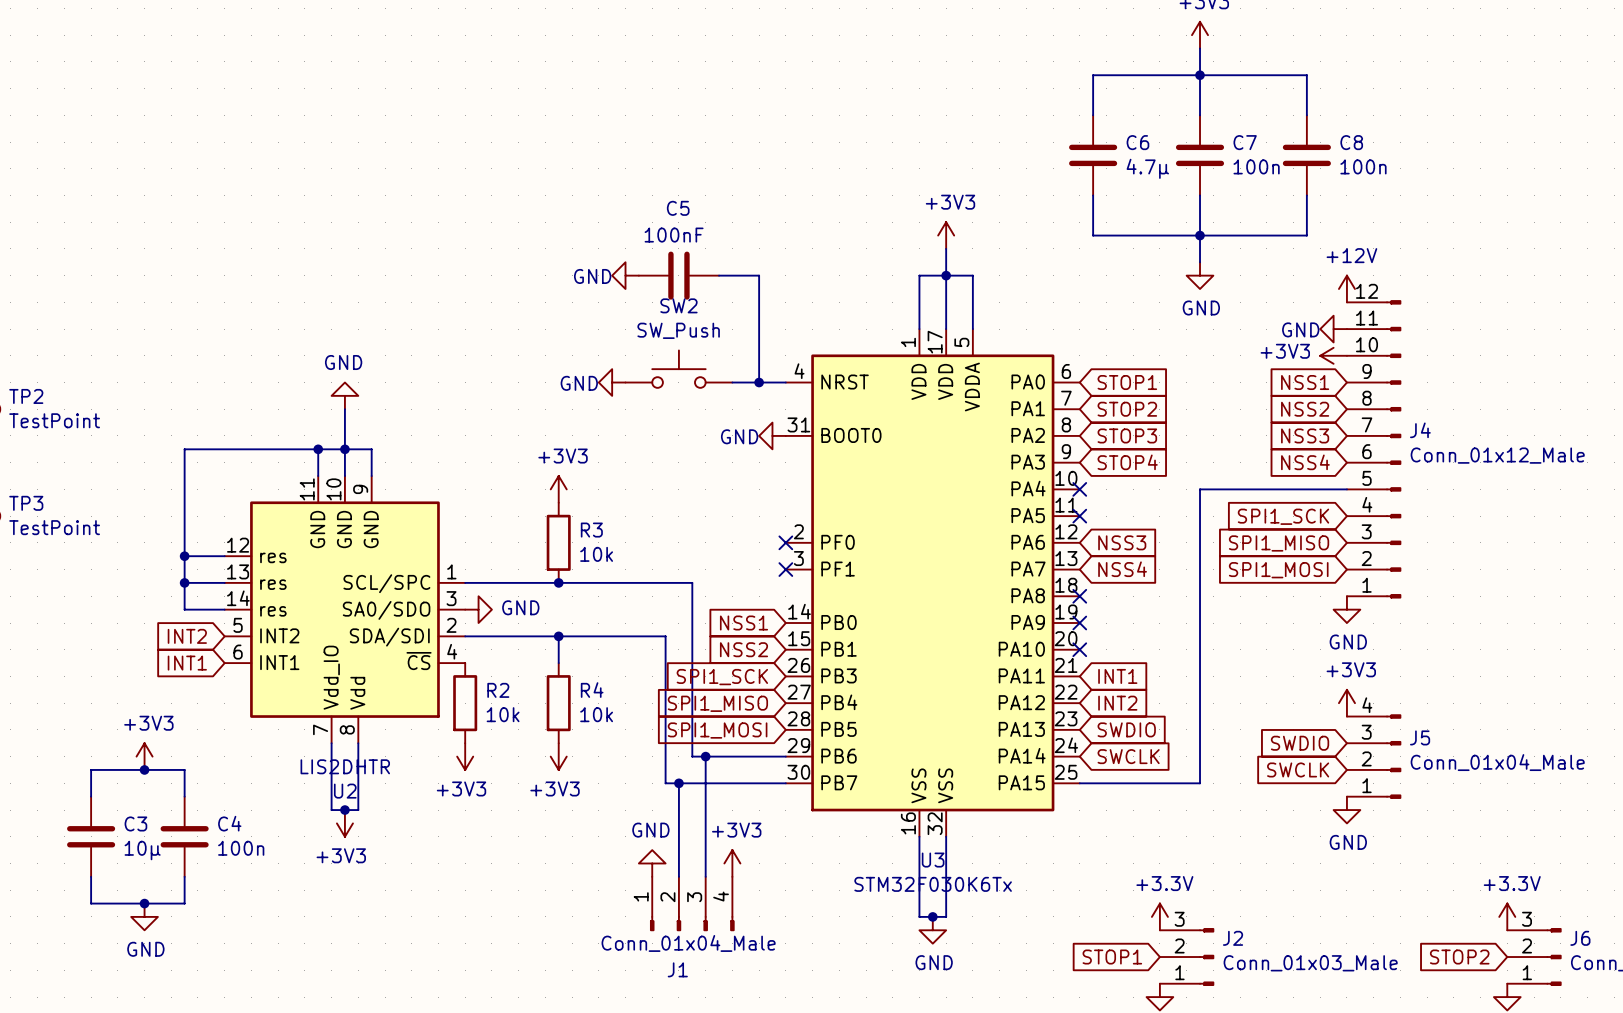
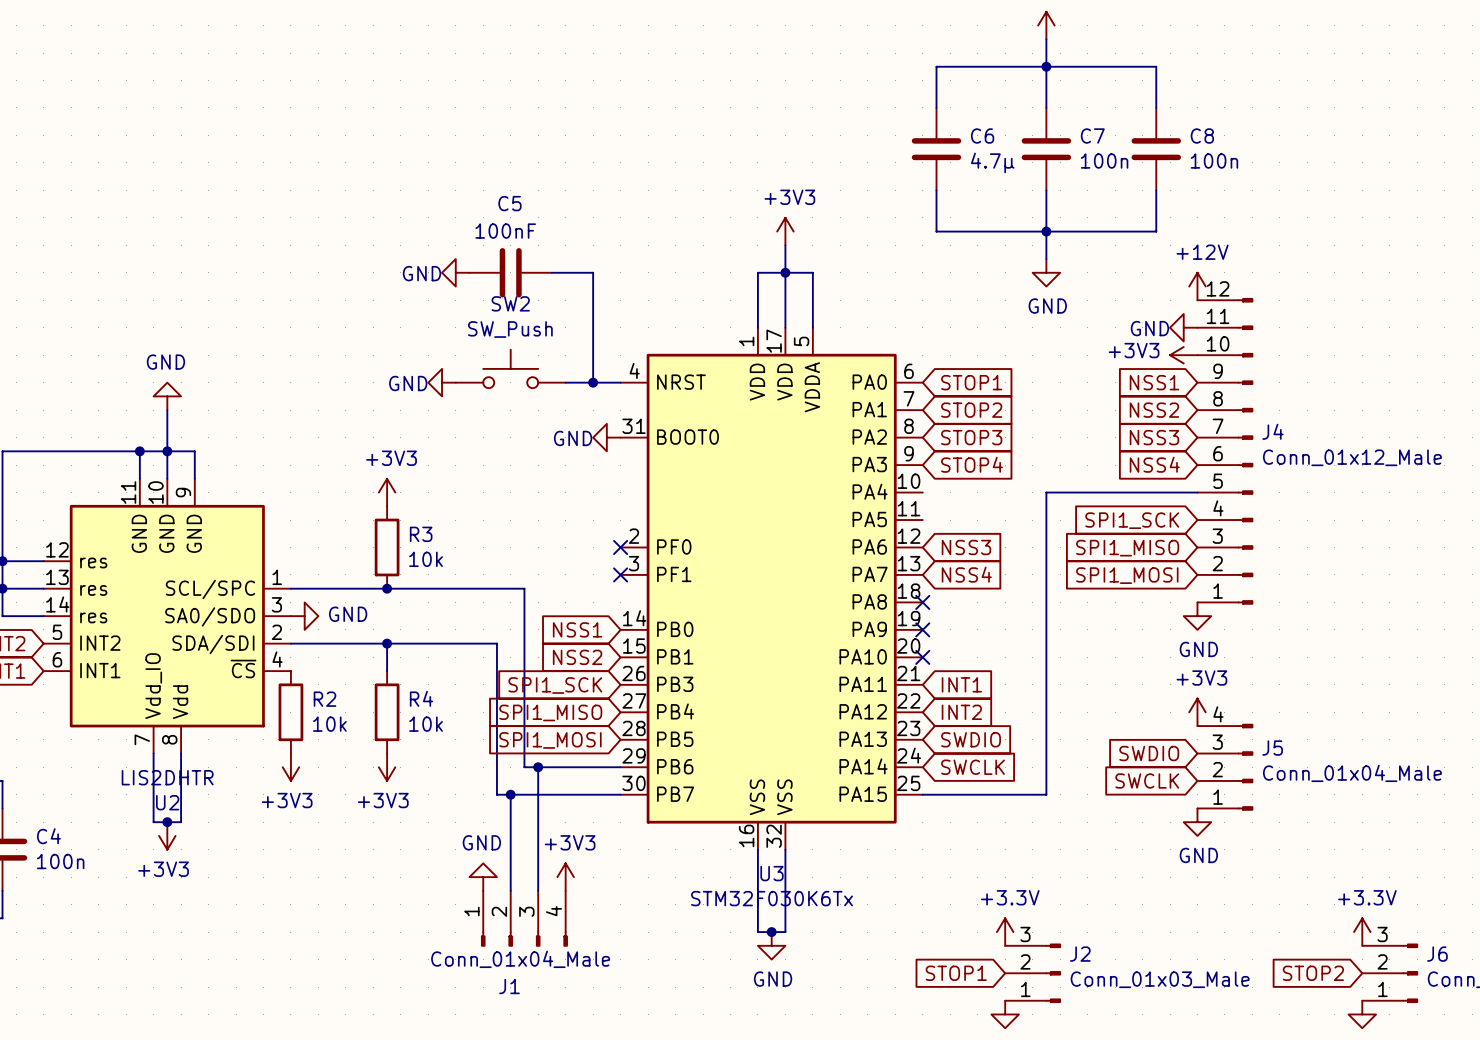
no-connect mark: (1079, 489) -> none
no-connect mark: (1079, 516) -> none

